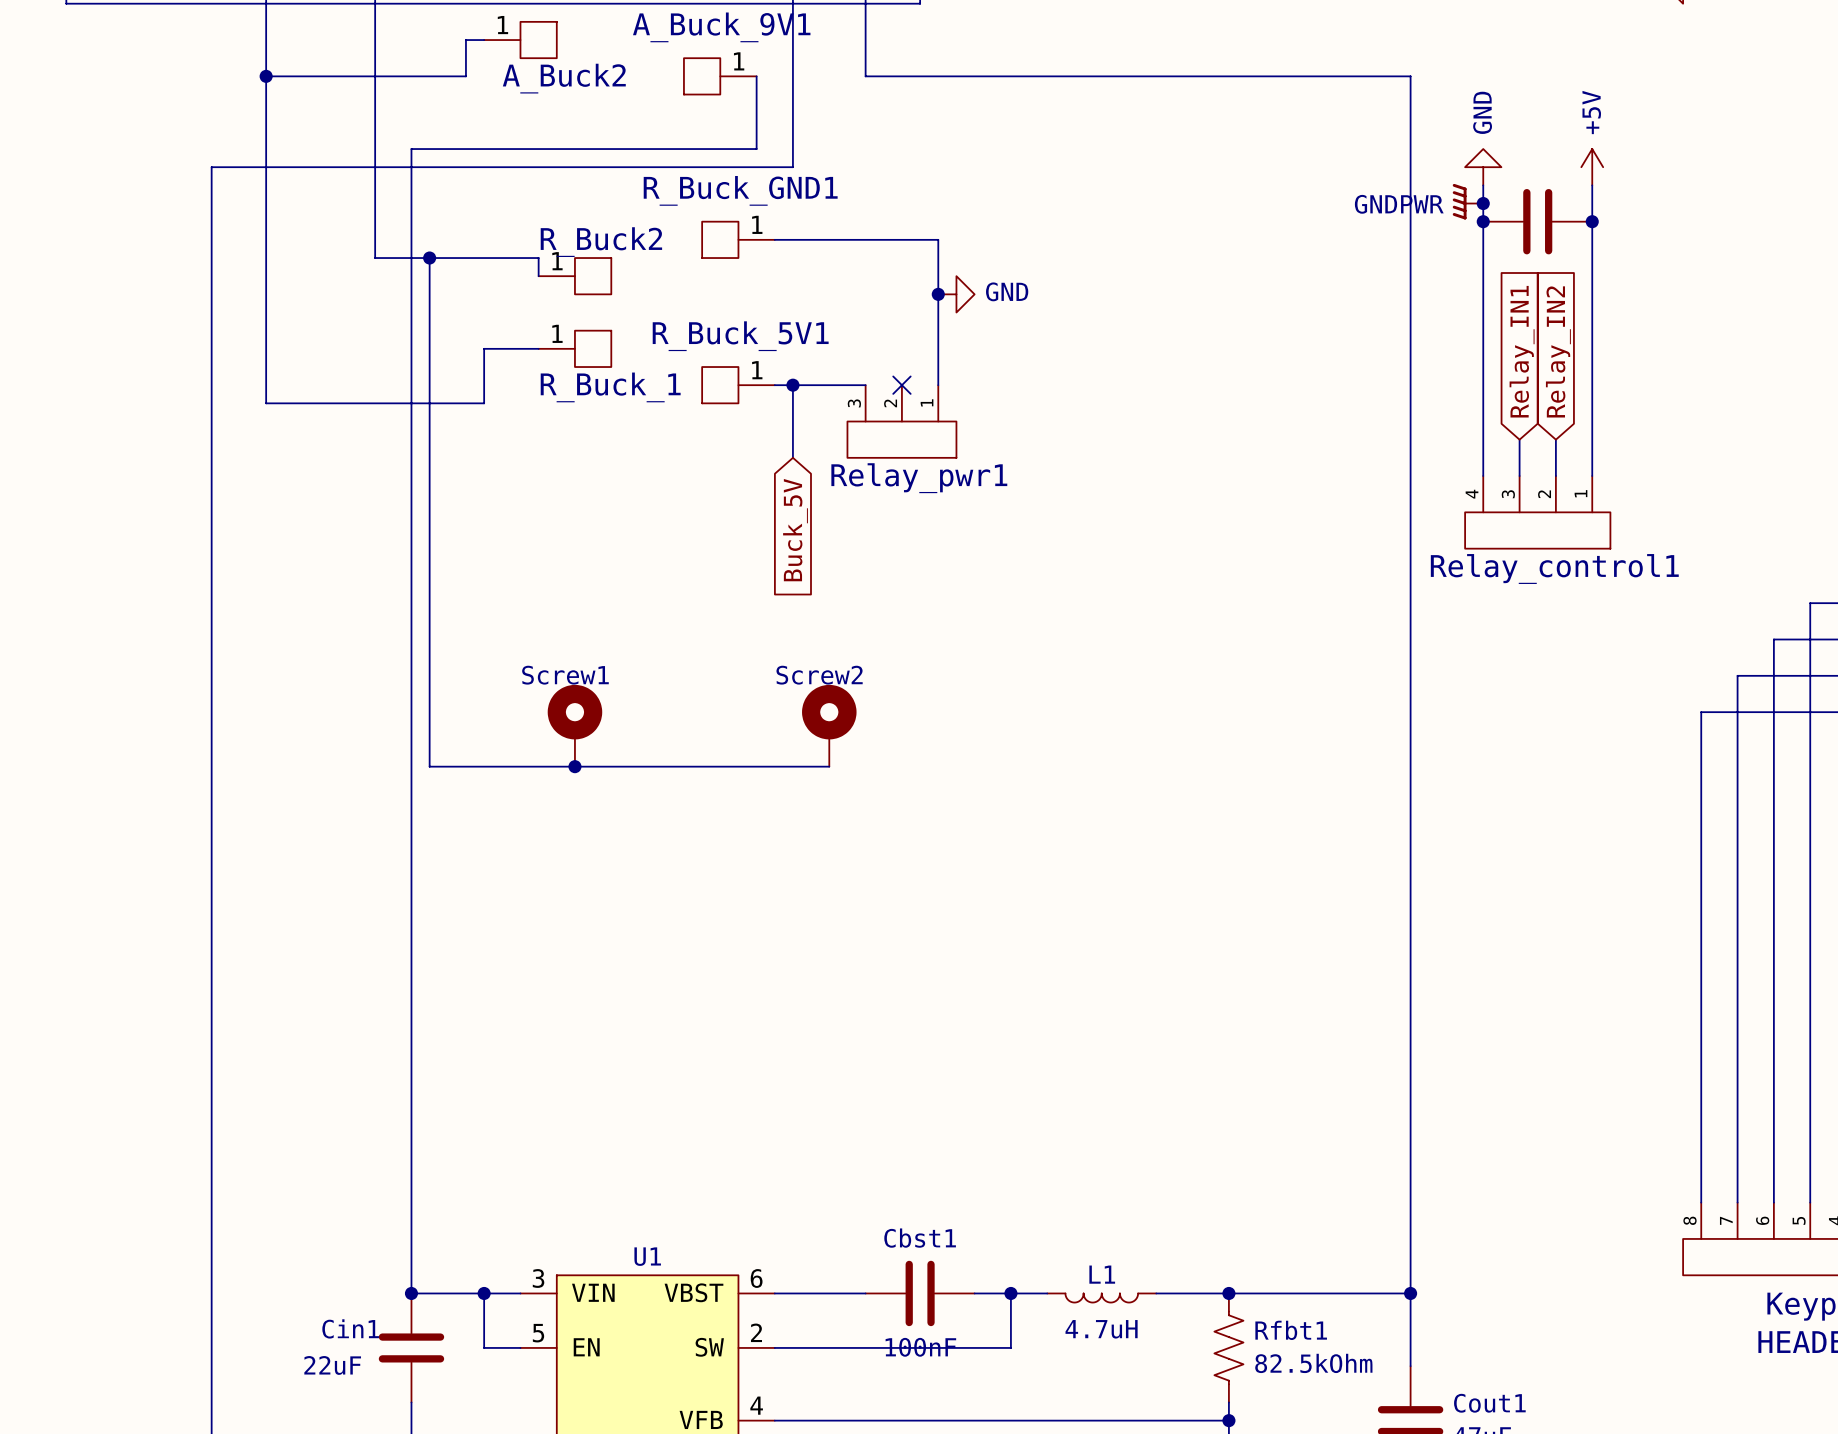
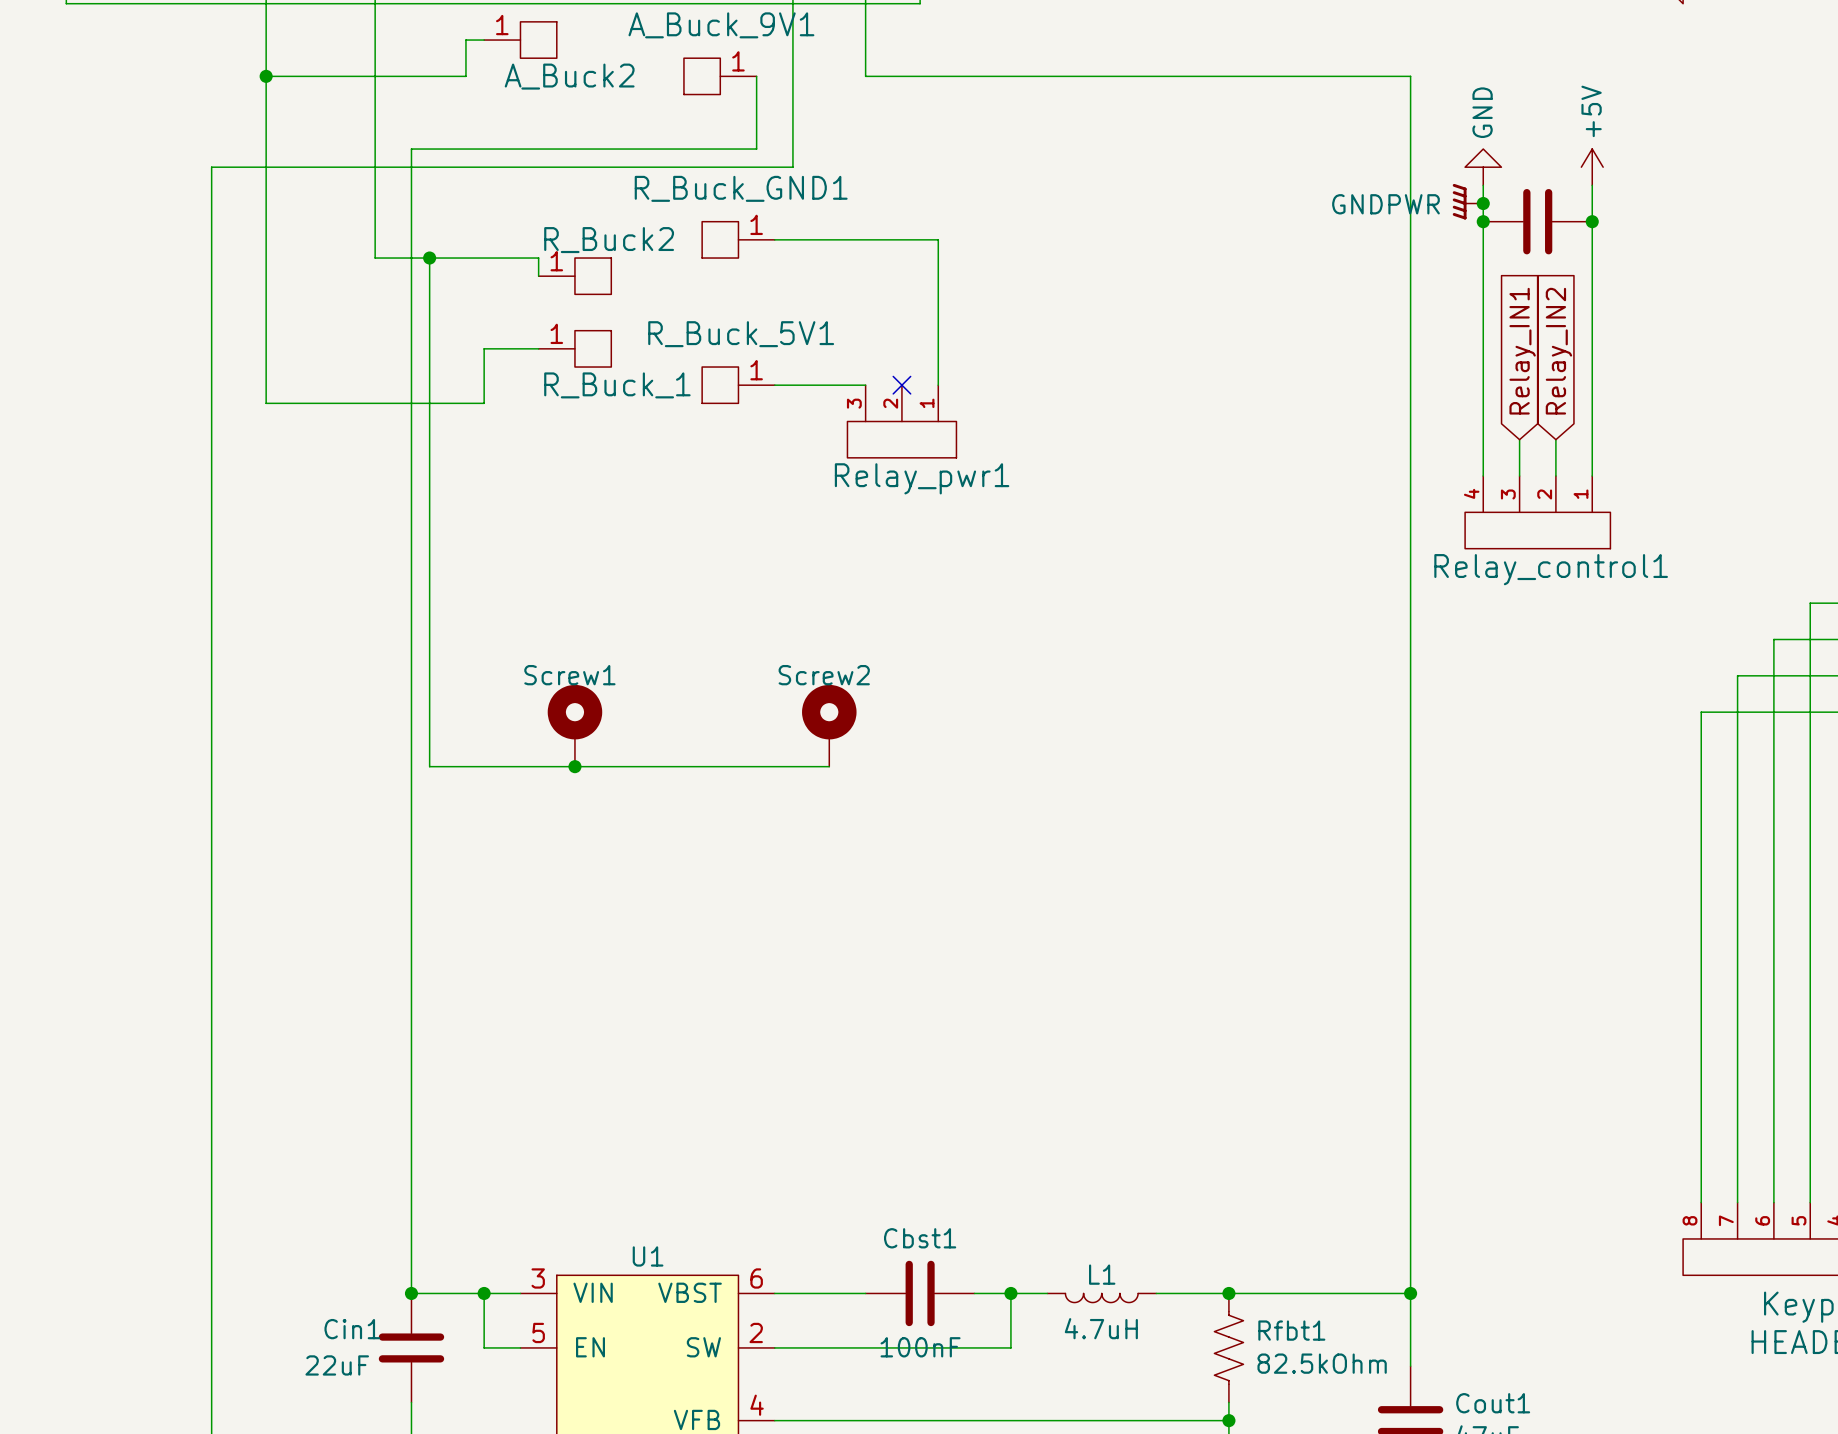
junction: (938, 294) -> none
power symbol: GND (956, 294) -> none
wire: (792, 385) (792, 457) -> none
junction: (792, 385) -> none
global label: Buck_5V (795, 530) -> none

